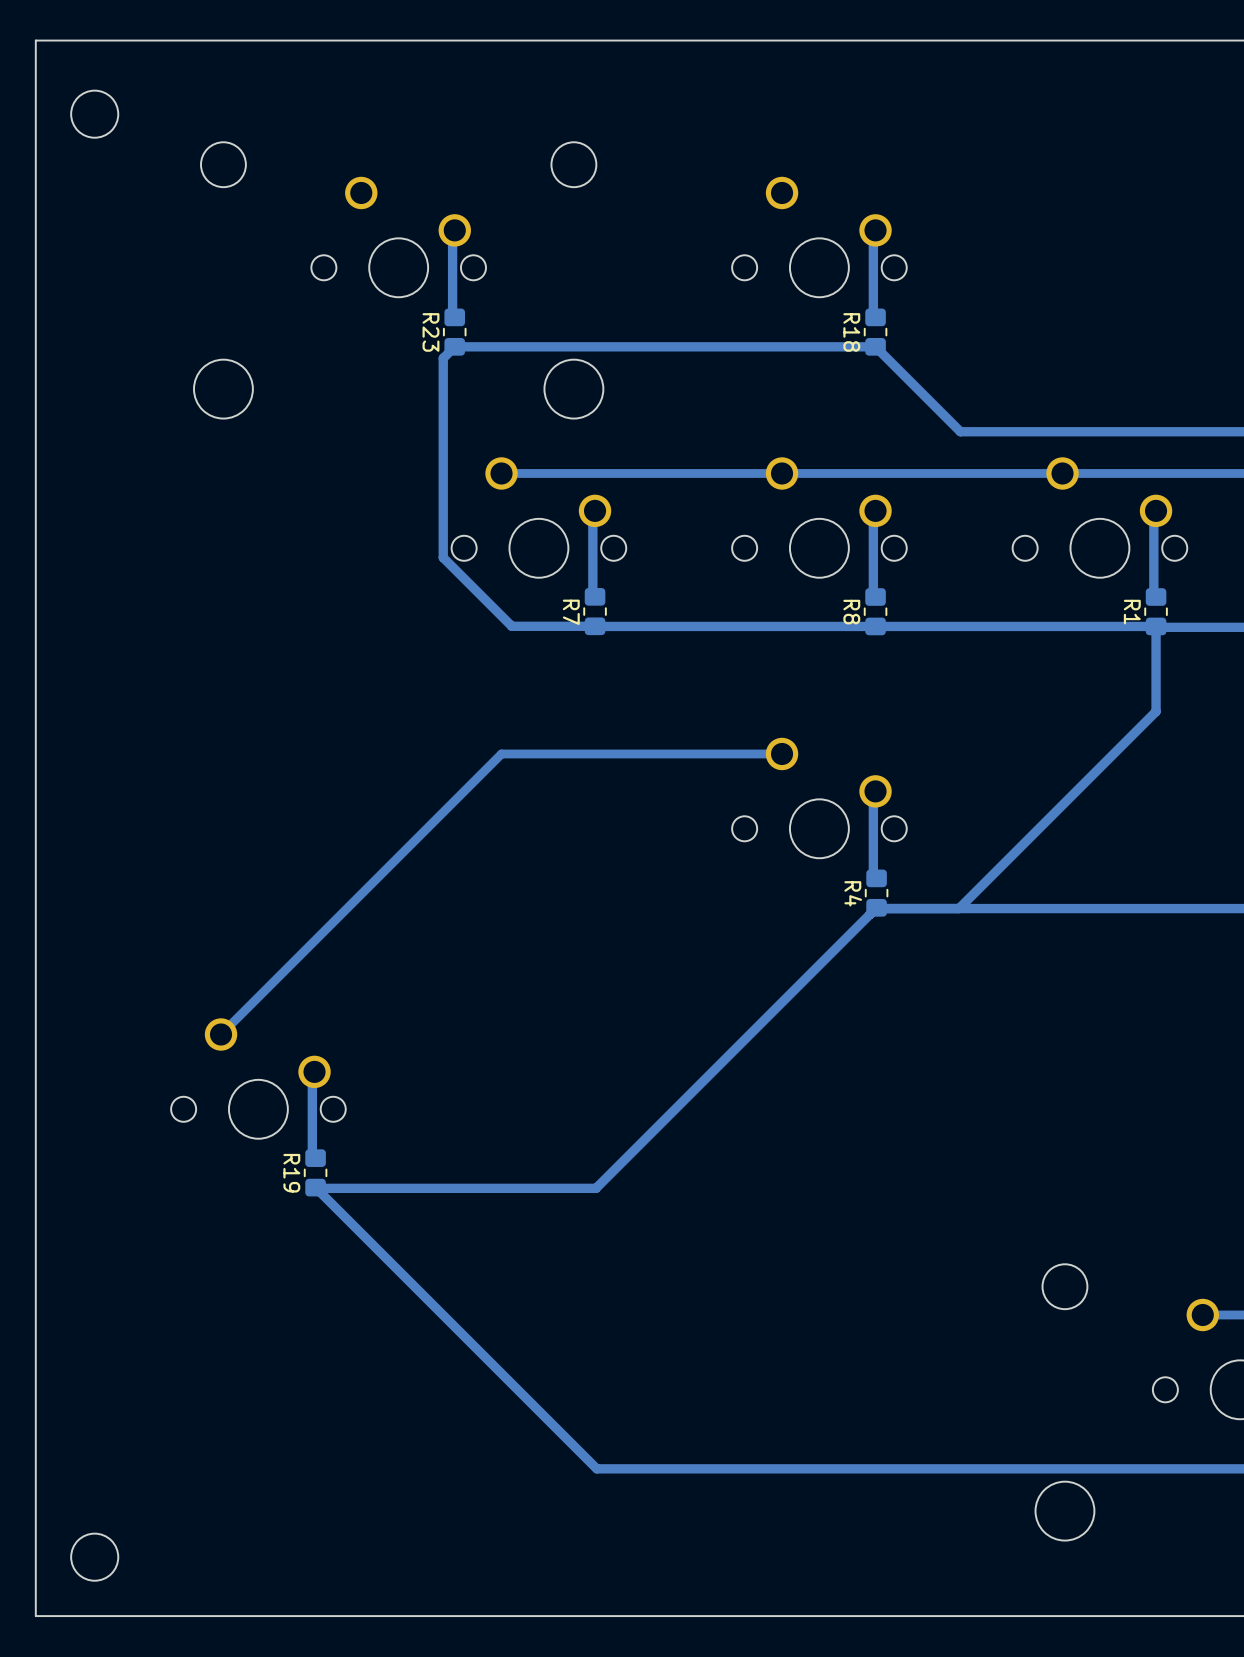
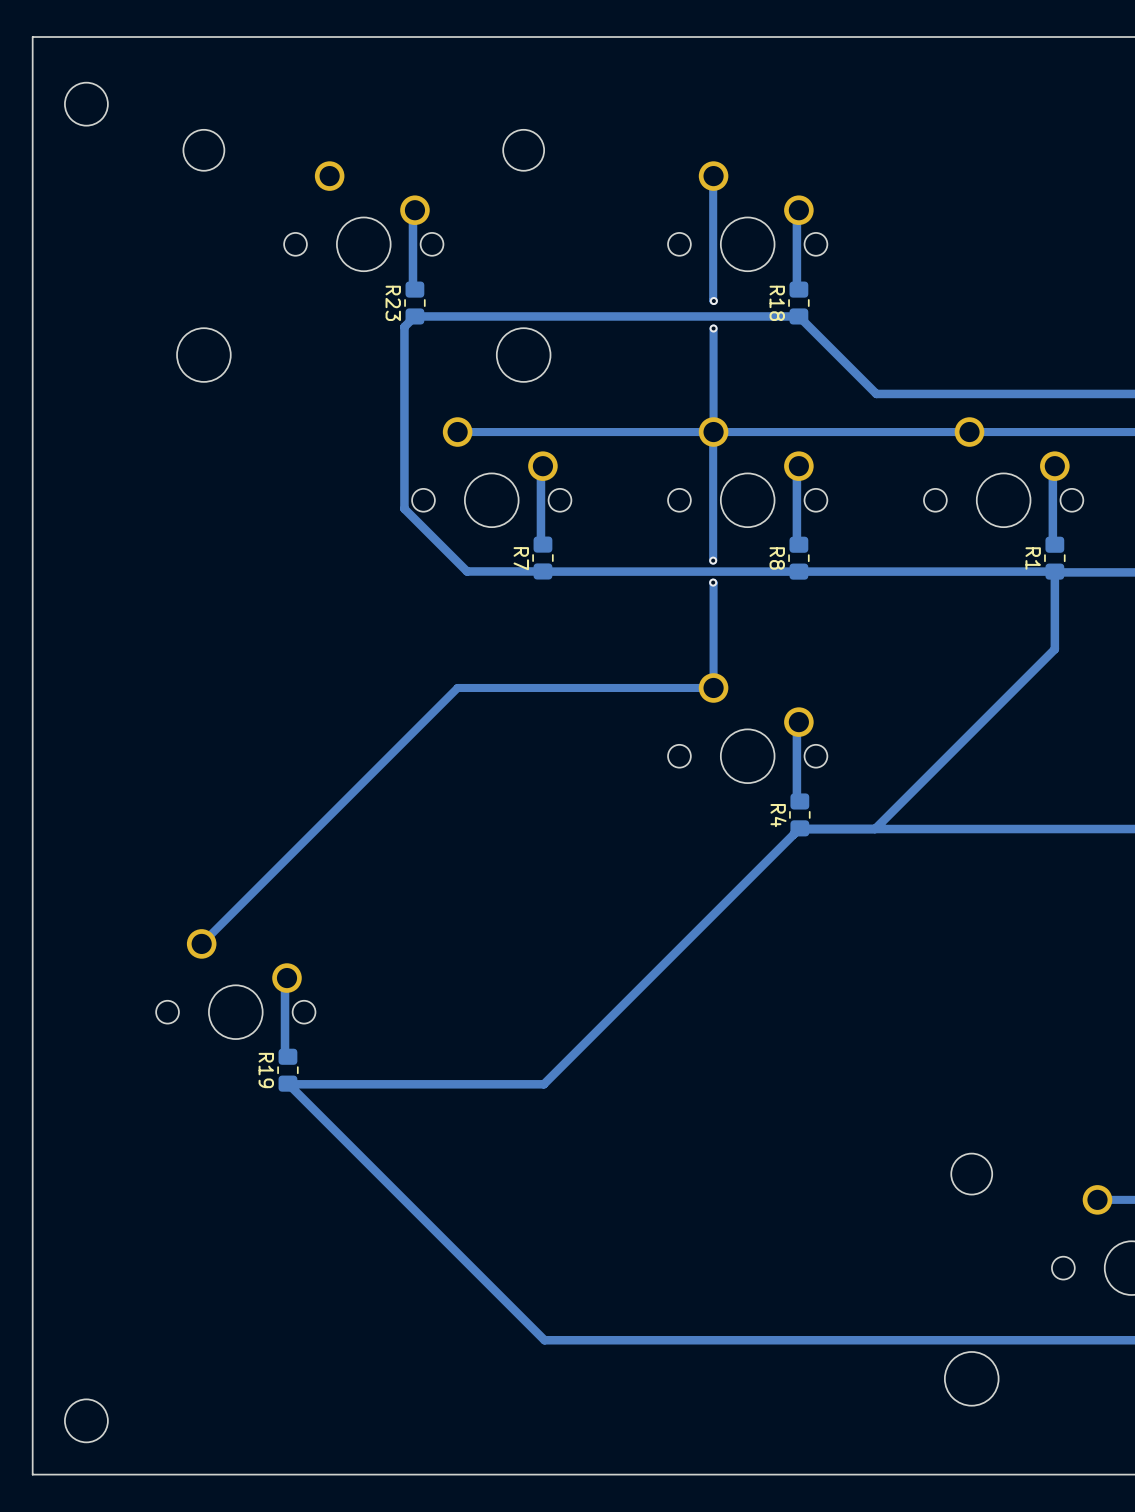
track: none -> (713, 176) (713, 301)
via: none -> (713, 301)
track: none -> (713, 328) (713, 560)
via: none -> (713, 328)
via: none -> (713, 560)
track: none -> (713, 582) (713, 687)
via: none -> (713, 582)

